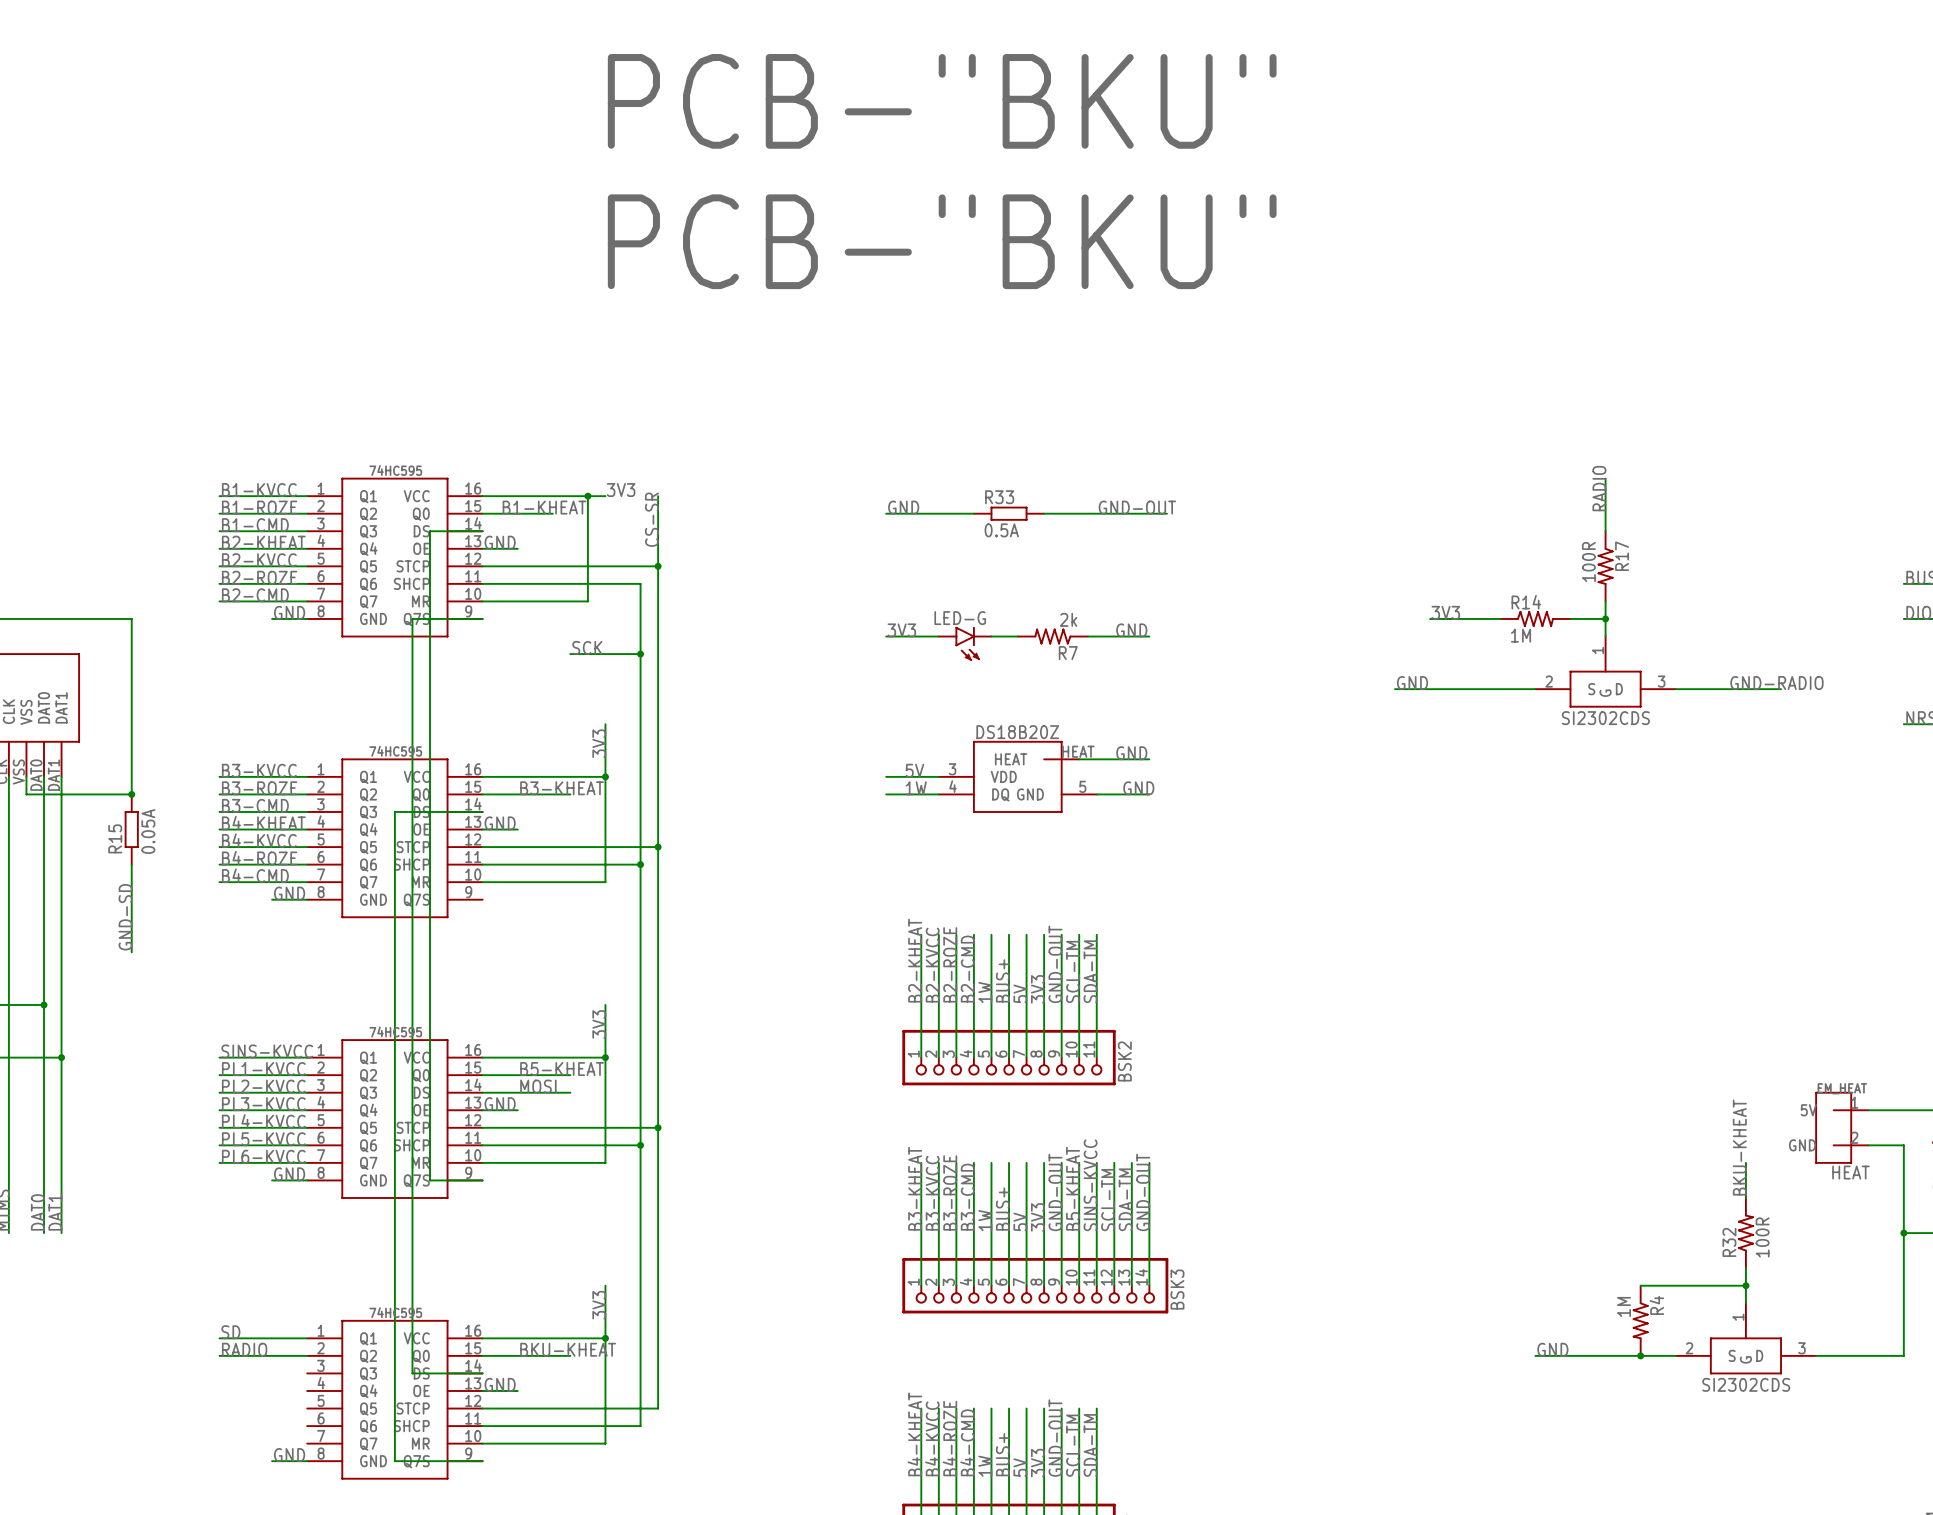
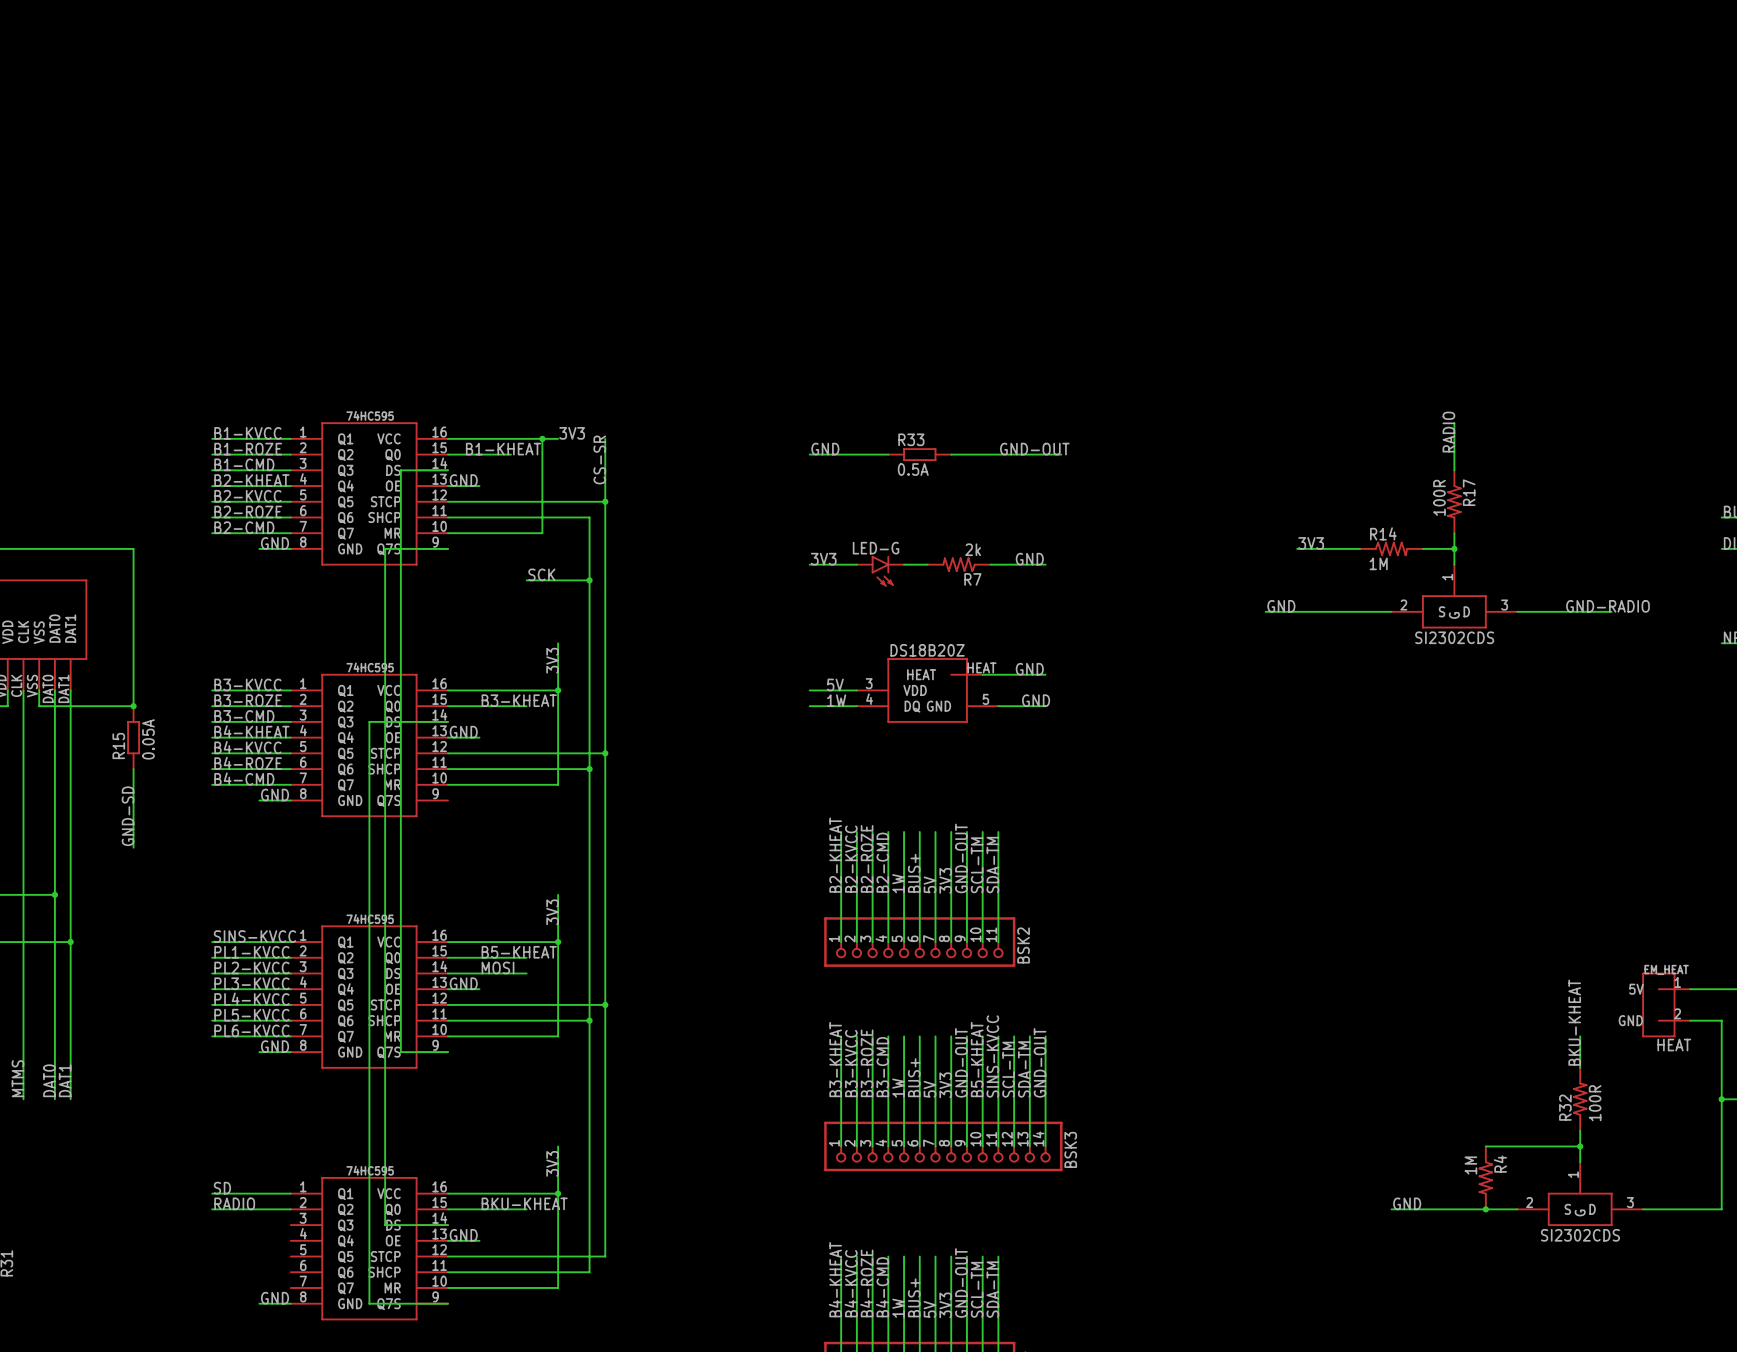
part: PCB-"BKU" (942, 101) -> none
part: PCB-"BKU" (942, 241) -> none

